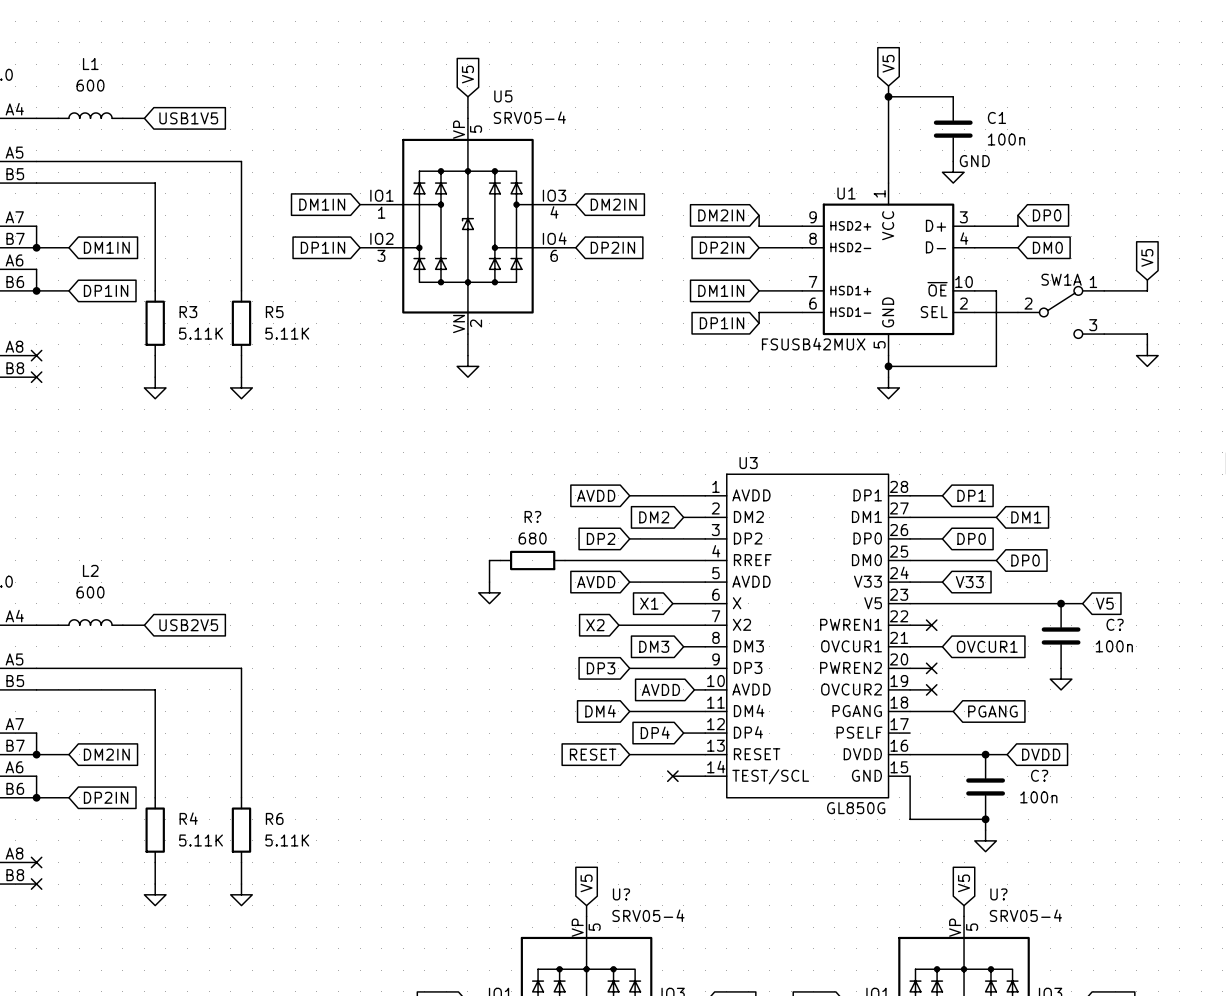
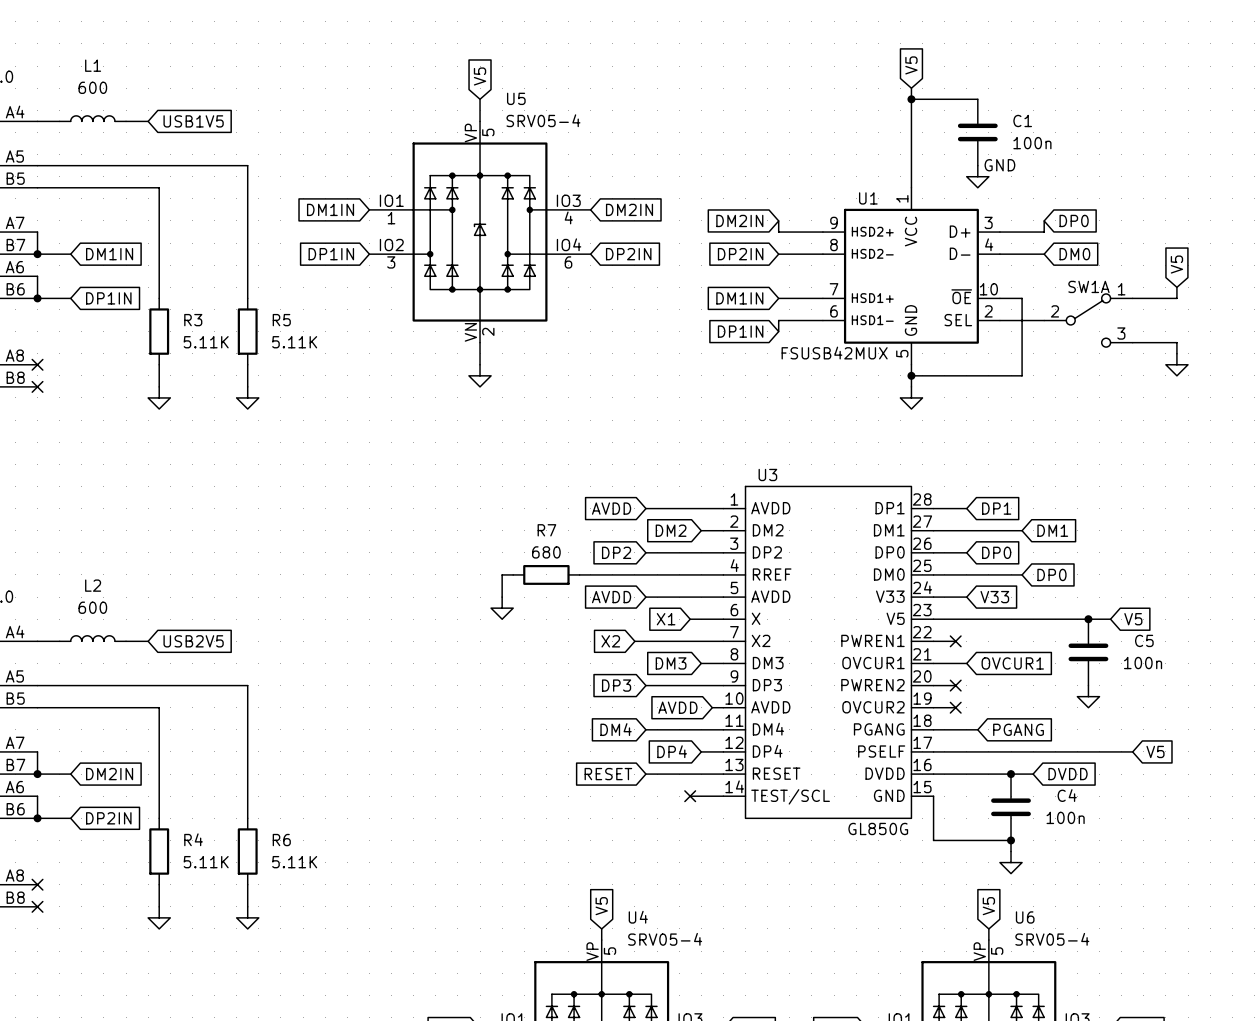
R? name: R? (532, 516) -> R7 (546, 530)
C? name: C? (1115, 624) -> C5 (1144, 640)
wire: none -> (933, 751) (1132, 751)
global label: none -> V5 (1155, 751)
C? name: C? (1039, 775) -> C4 (1067, 795)
U? name: U? (621, 894) -> U4 (638, 917)
U? name: U? (998, 894) -> U6 (1025, 917)

